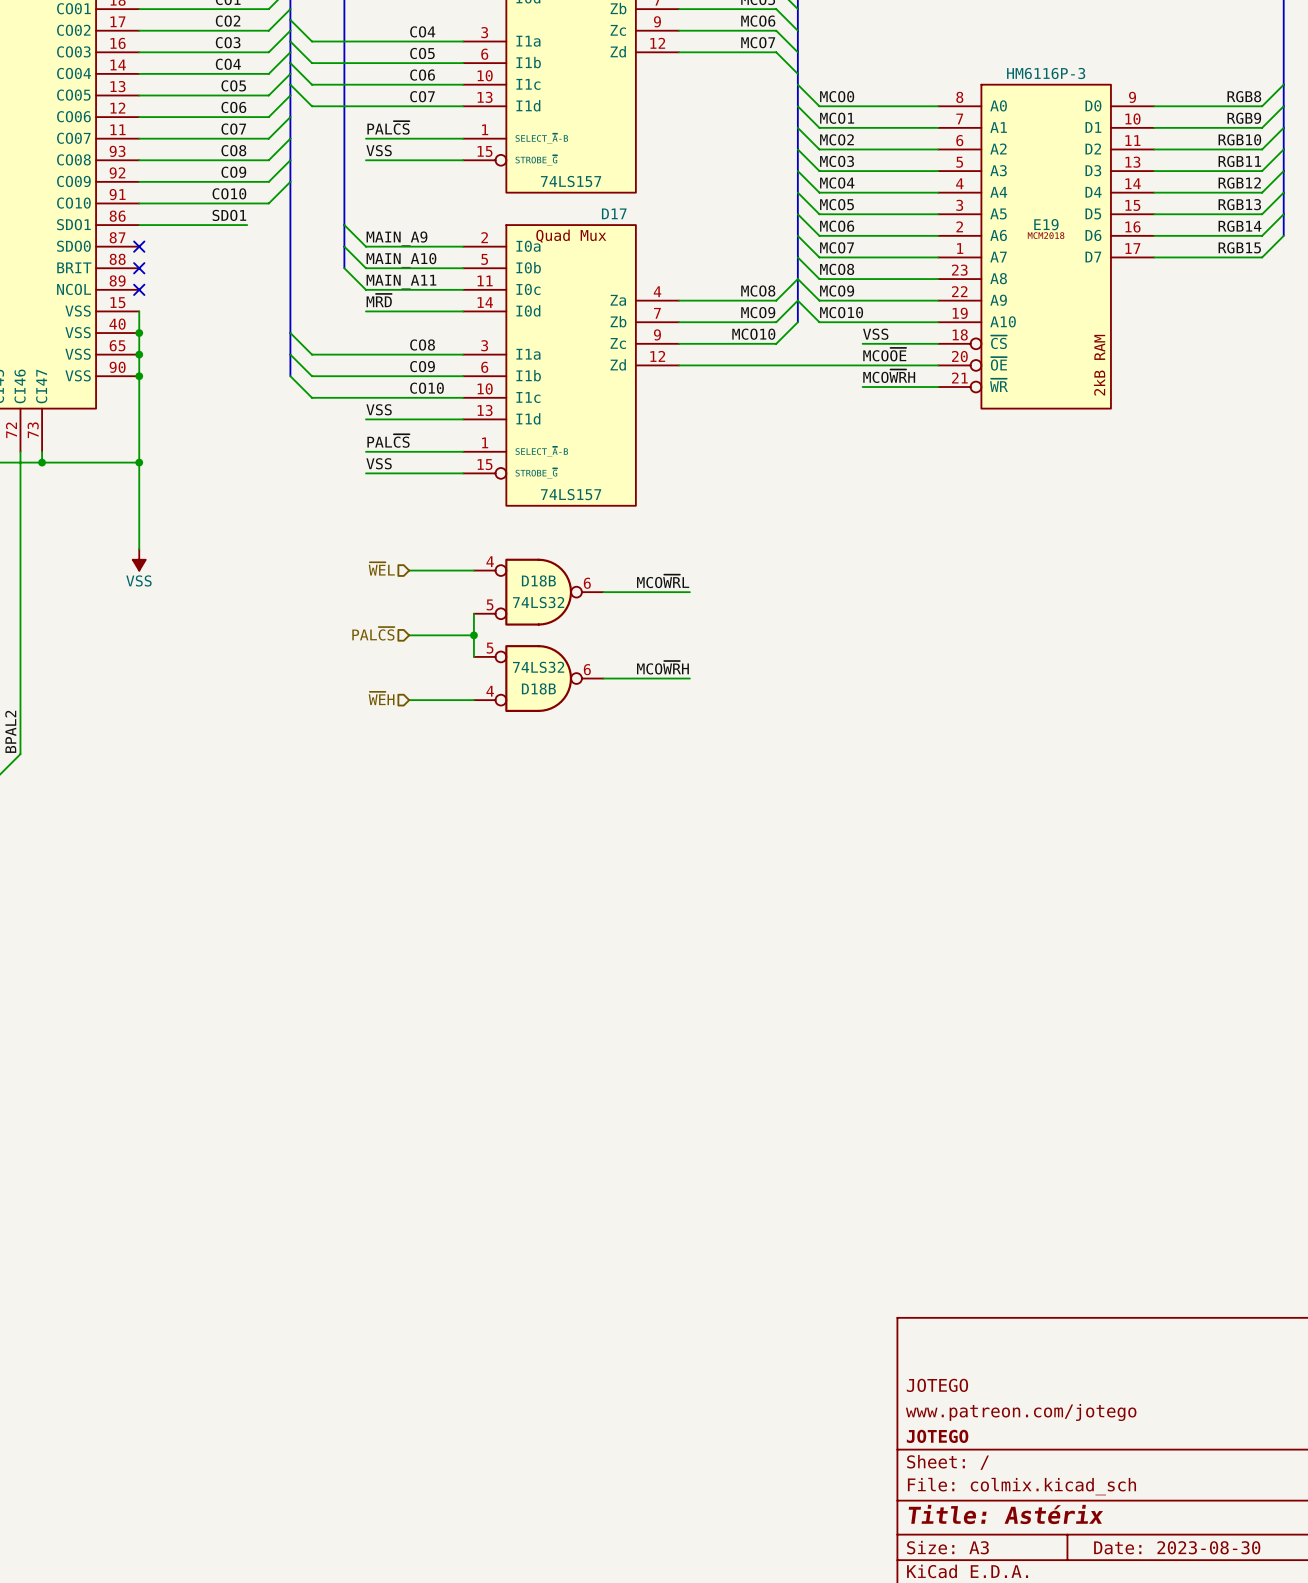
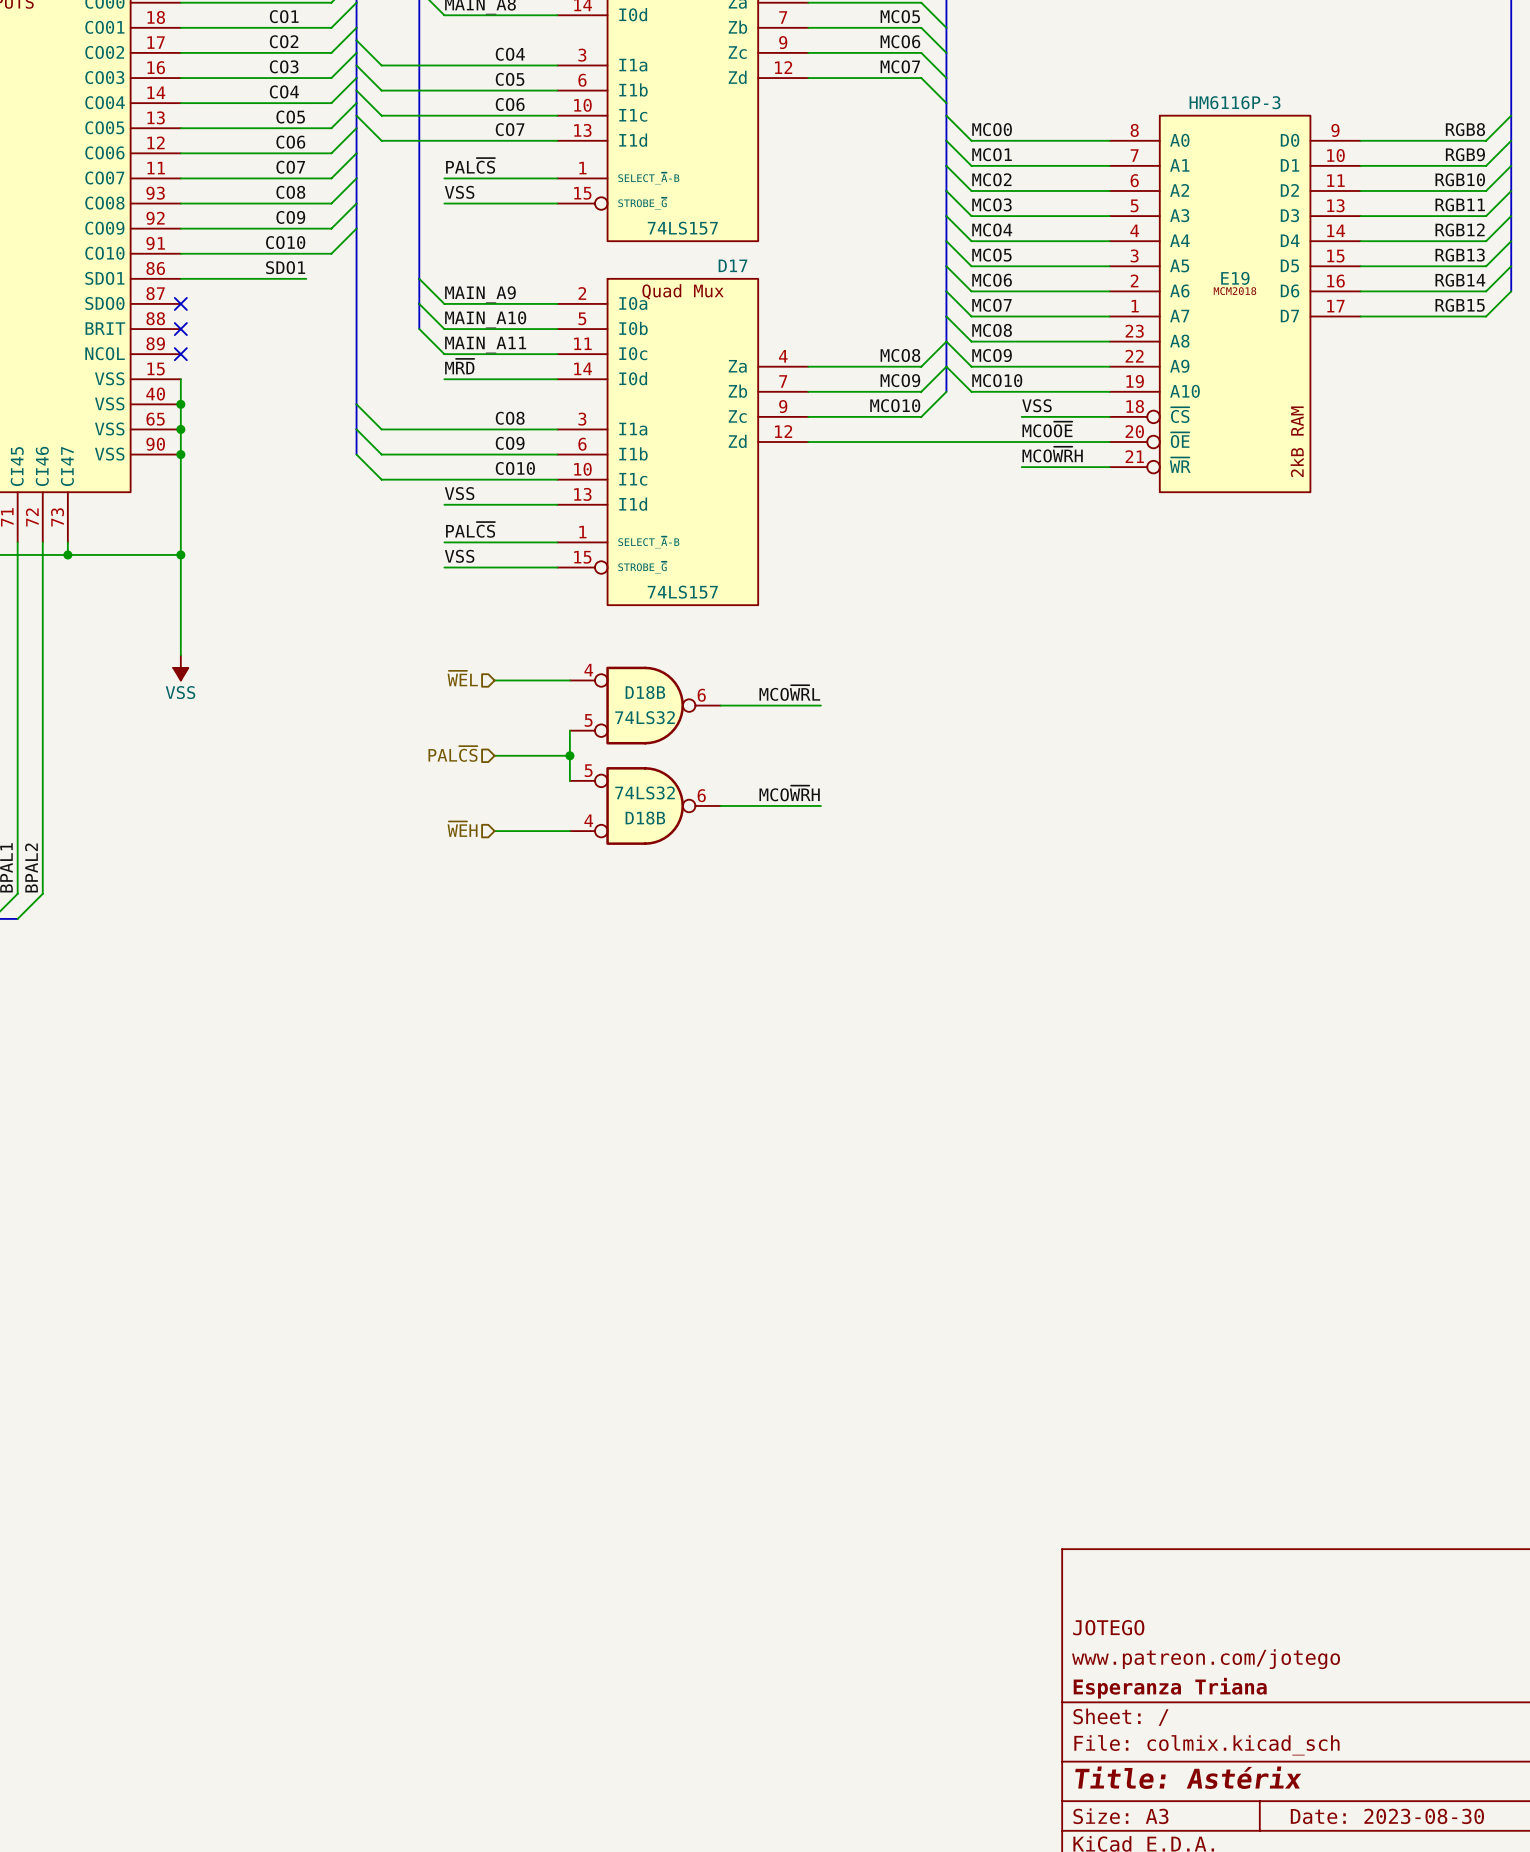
title block: JOTEGO (937, 1436) -> Esperanza Triana (1170, 1688)

